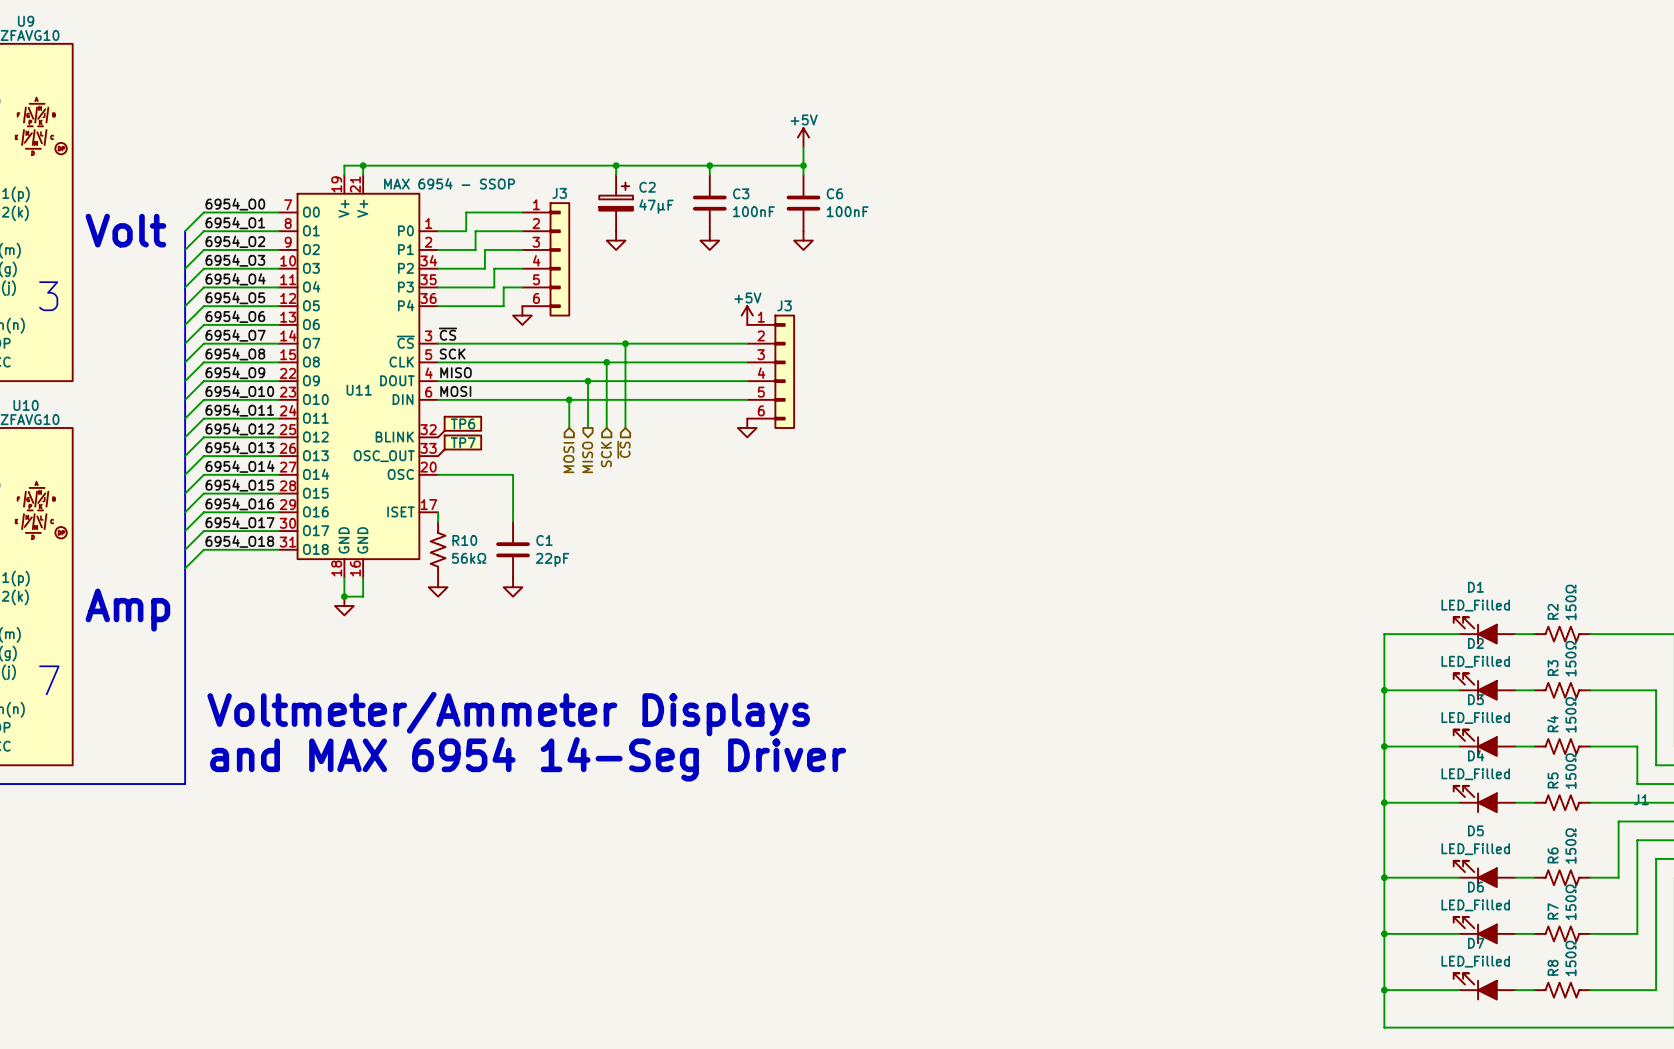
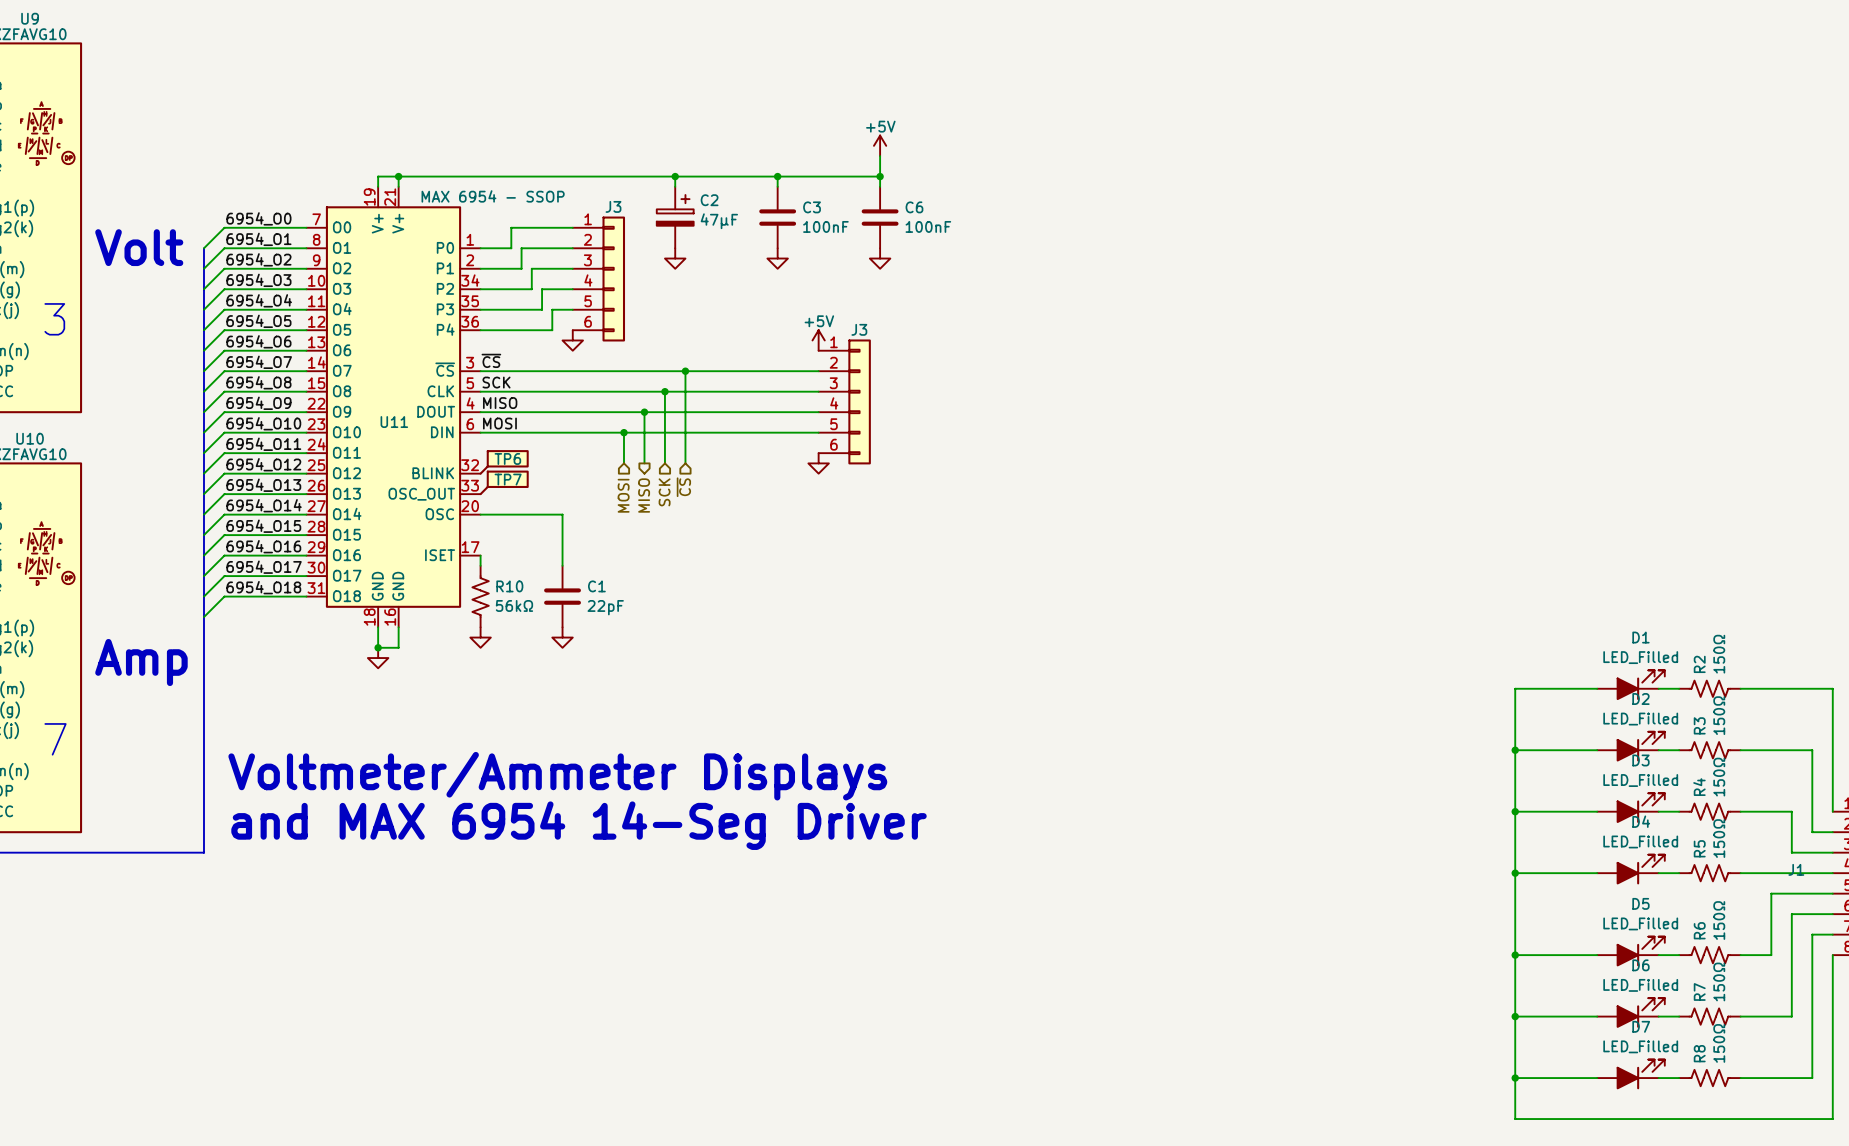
D1 flip: as is (1475, 630) -> left-right (1640, 685)
D2 flip: as is (1475, 687) -> left-right (1640, 746)
D3 flip: as is (1475, 743) -> left-right (1640, 808)
D4 flip: as is (1475, 799) -> left-right (1640, 869)
D5 flip: as is (1475, 874) -> left-right (1640, 951)
D6 flip: as is (1475, 930) -> left-right (1640, 1012)
D7 flip: as is (1475, 986) -> left-right (1640, 1074)

